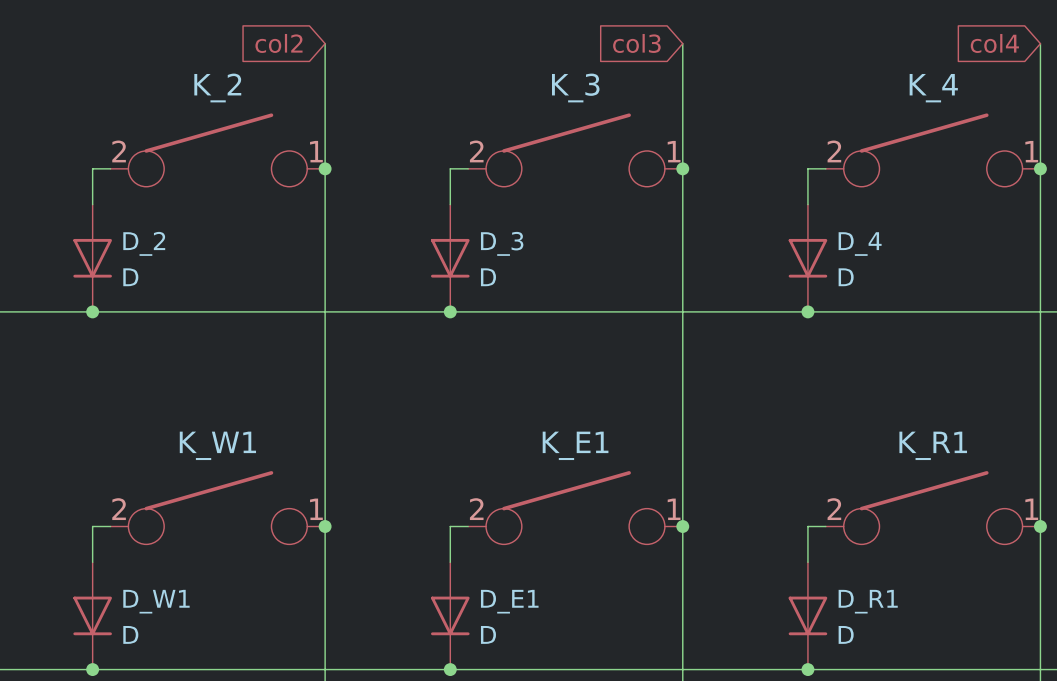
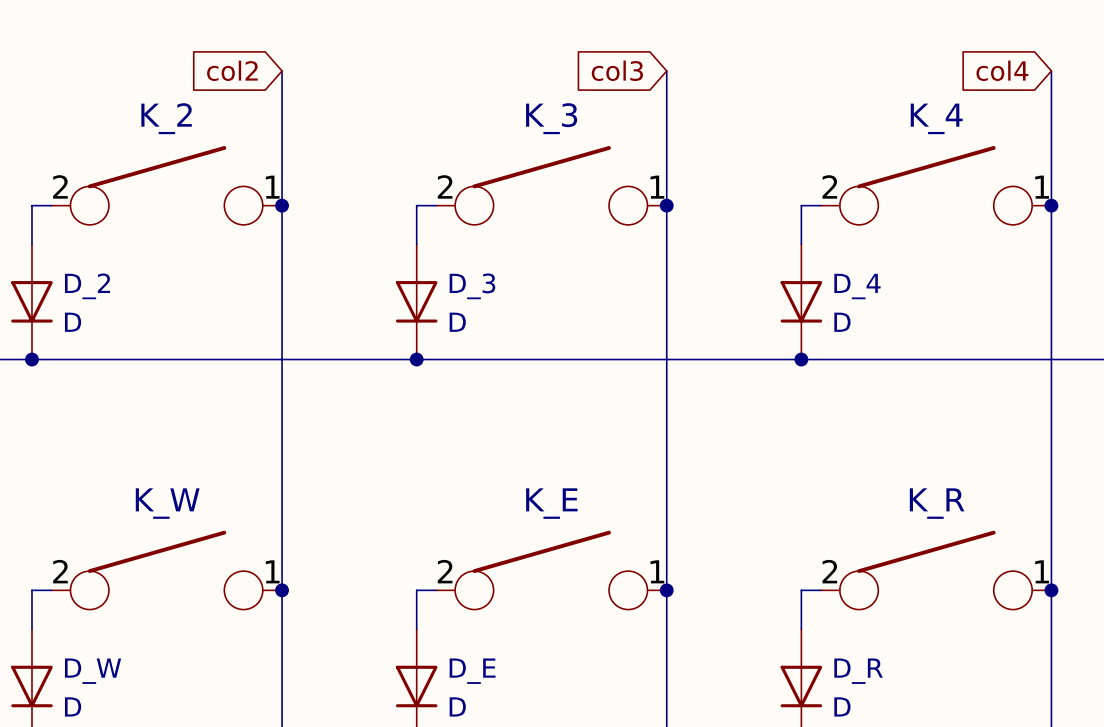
K_W1 name: K_W1 (217, 445) -> K_W (167, 503)
K_E1 name: K_E1 (575, 445) -> K_E (551, 503)
K_R1 name: K_R1 (933, 445) -> K_R (937, 503)
D_W1 name: D_W1 (156, 601) -> D_W (93, 671)
D_E1 name: D_E1 (509, 601) -> D_E (472, 671)
D_R1 name: D_R1 (868, 601) -> D_R (858, 671)

